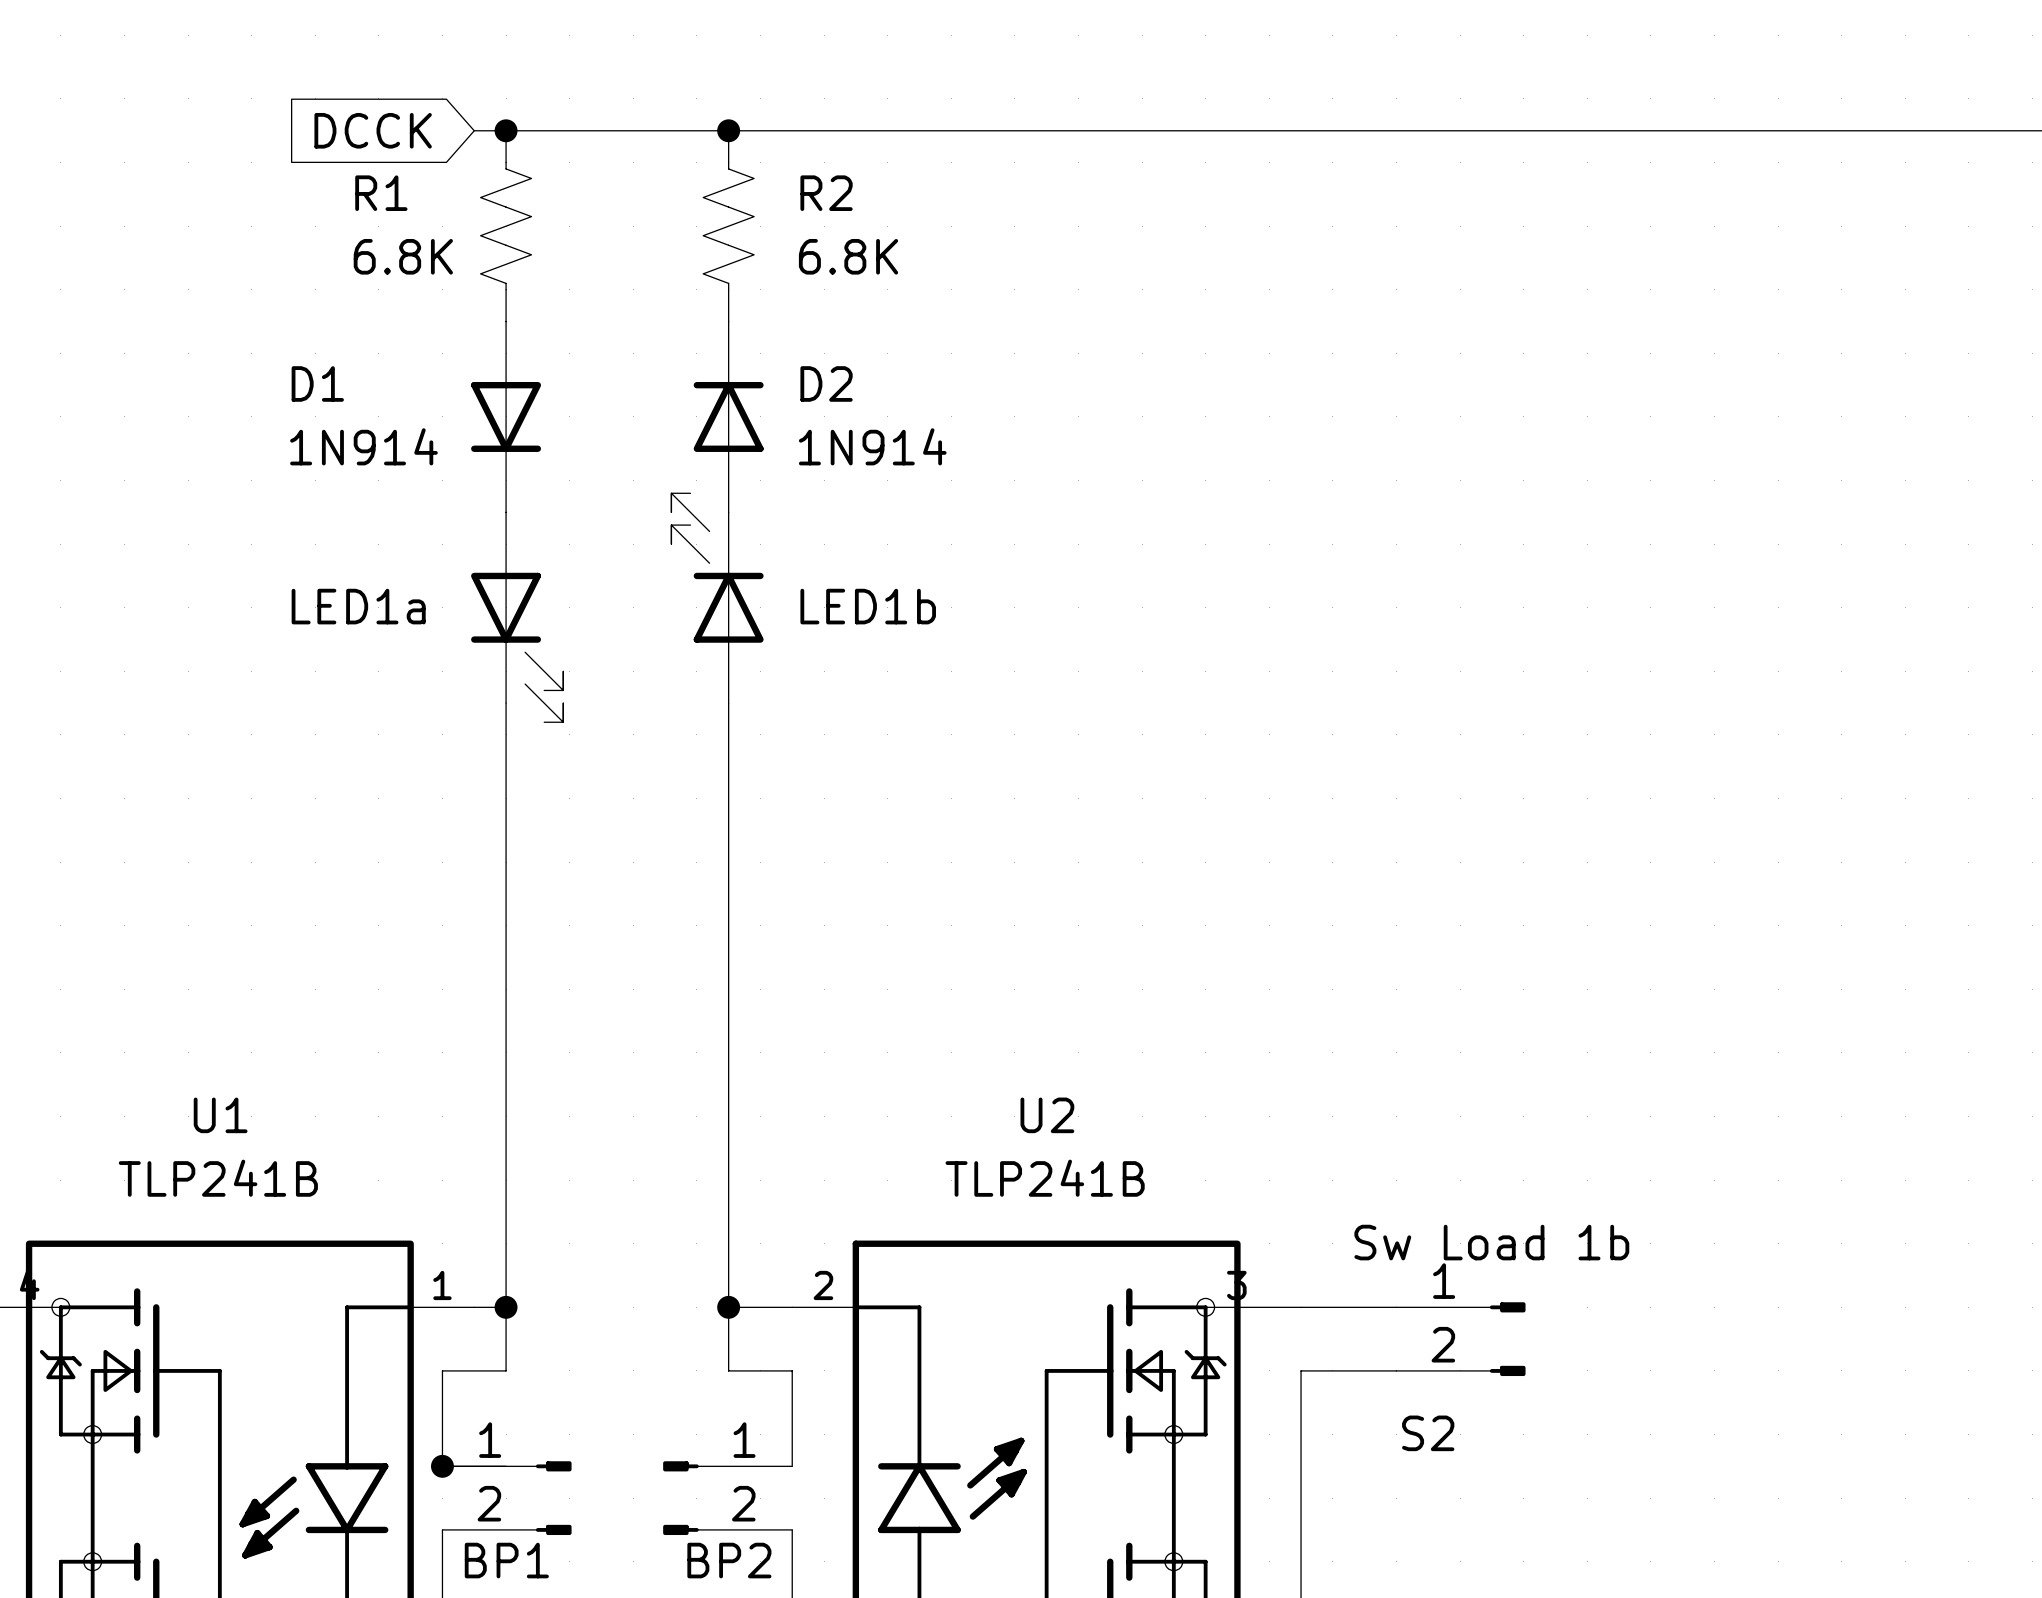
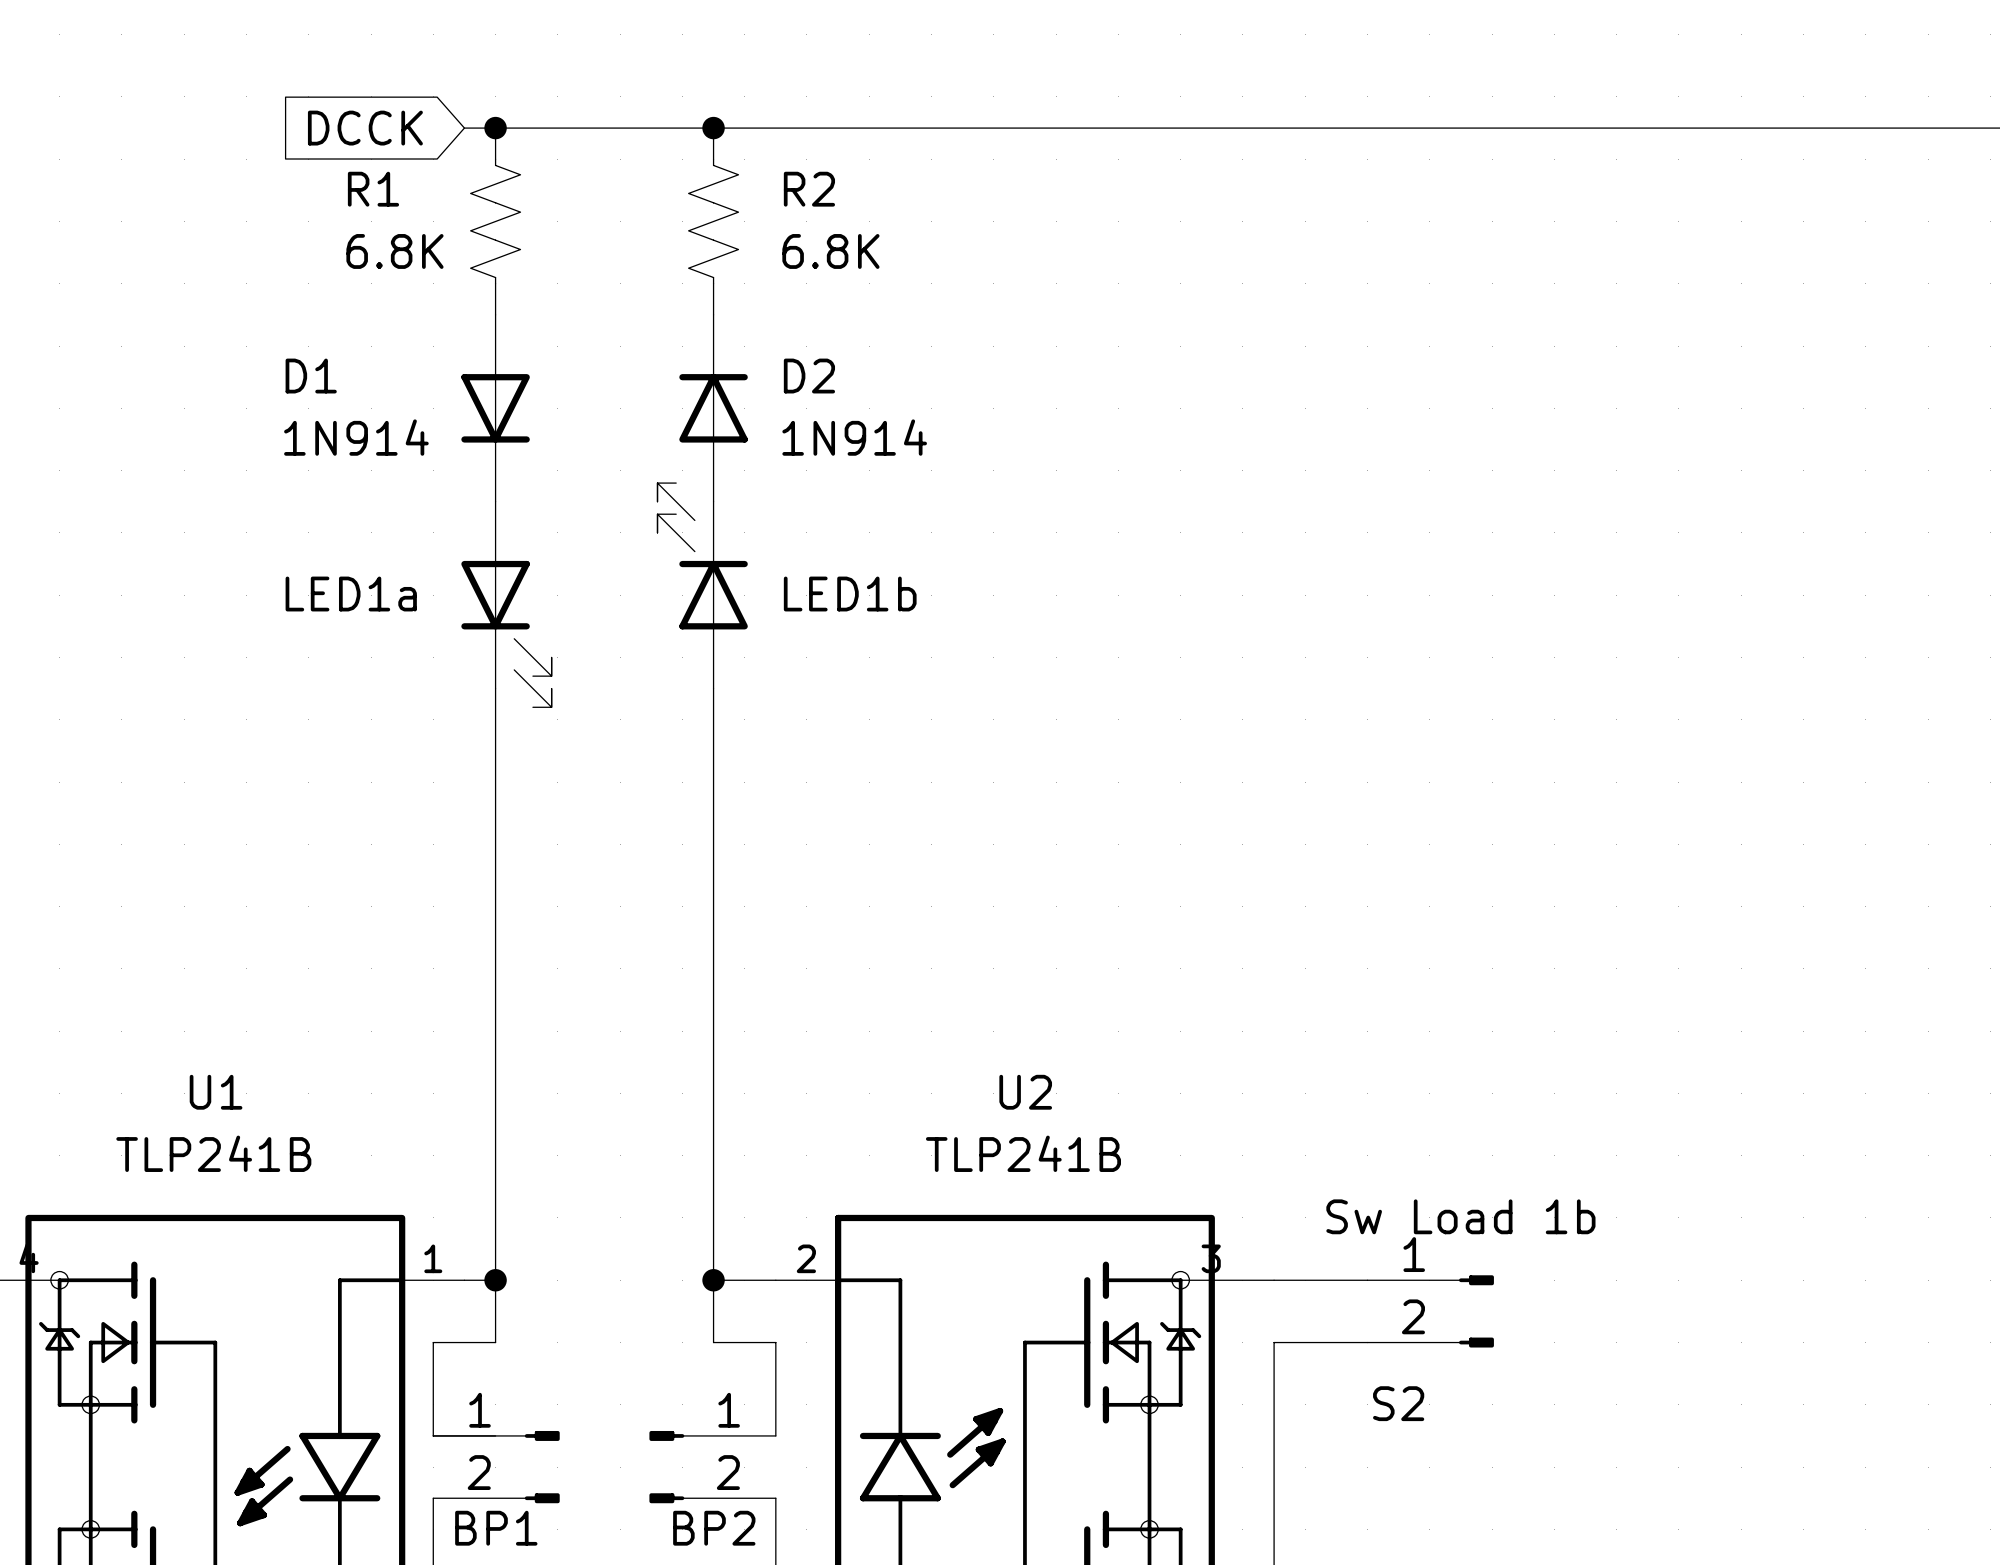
junction: (442, 1466) -> none

